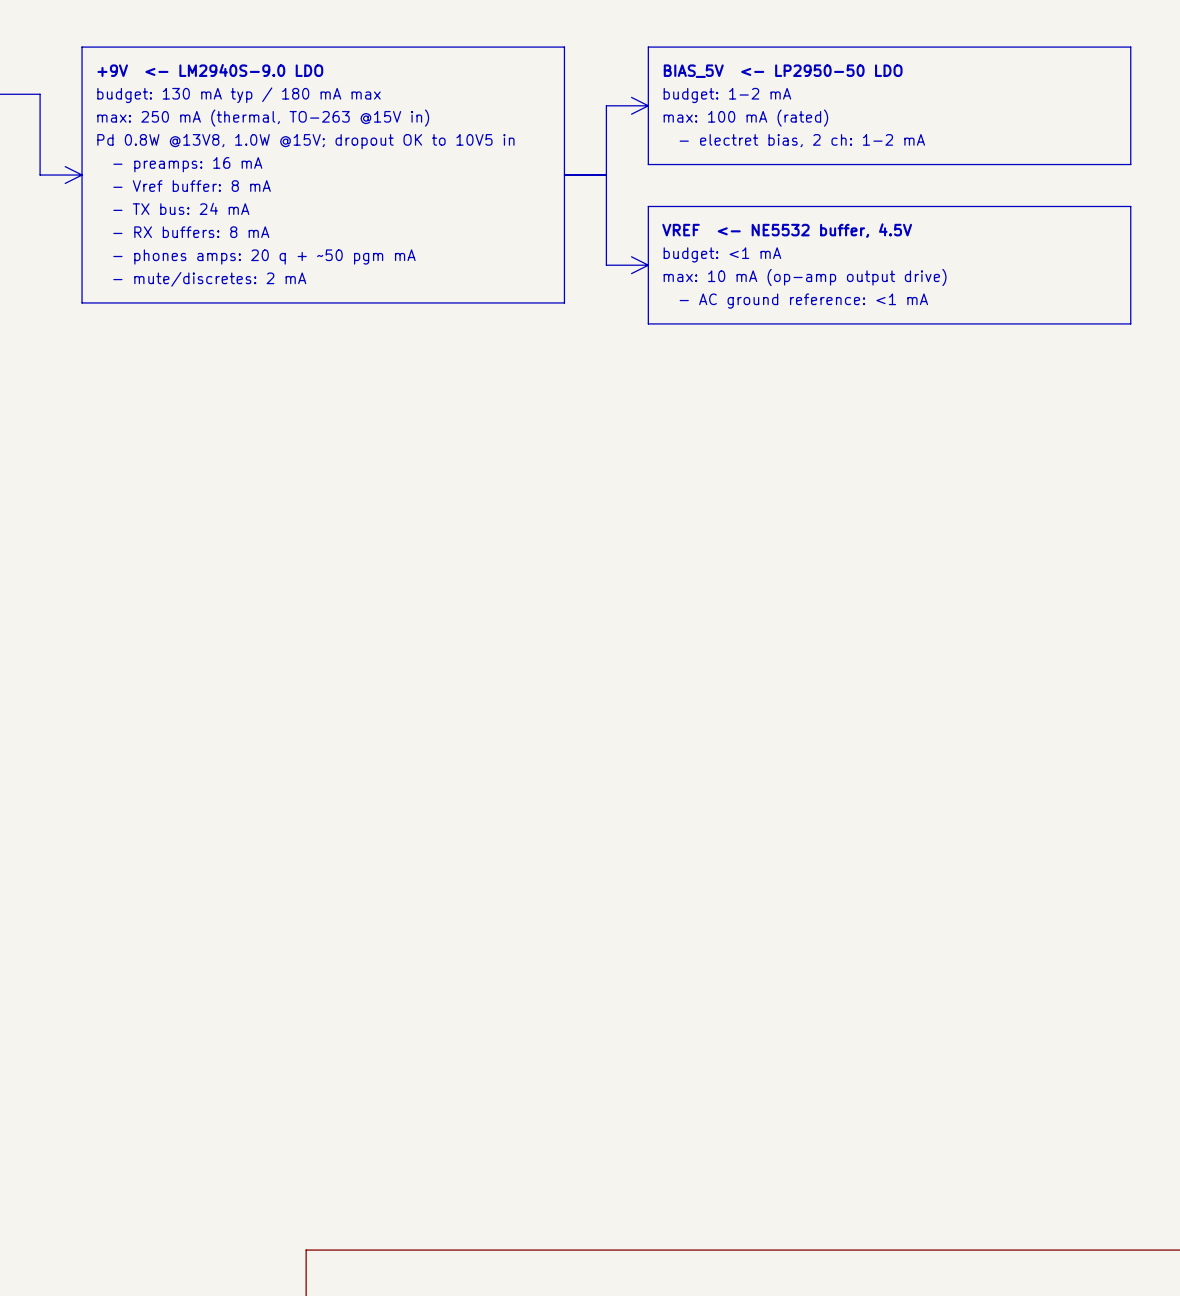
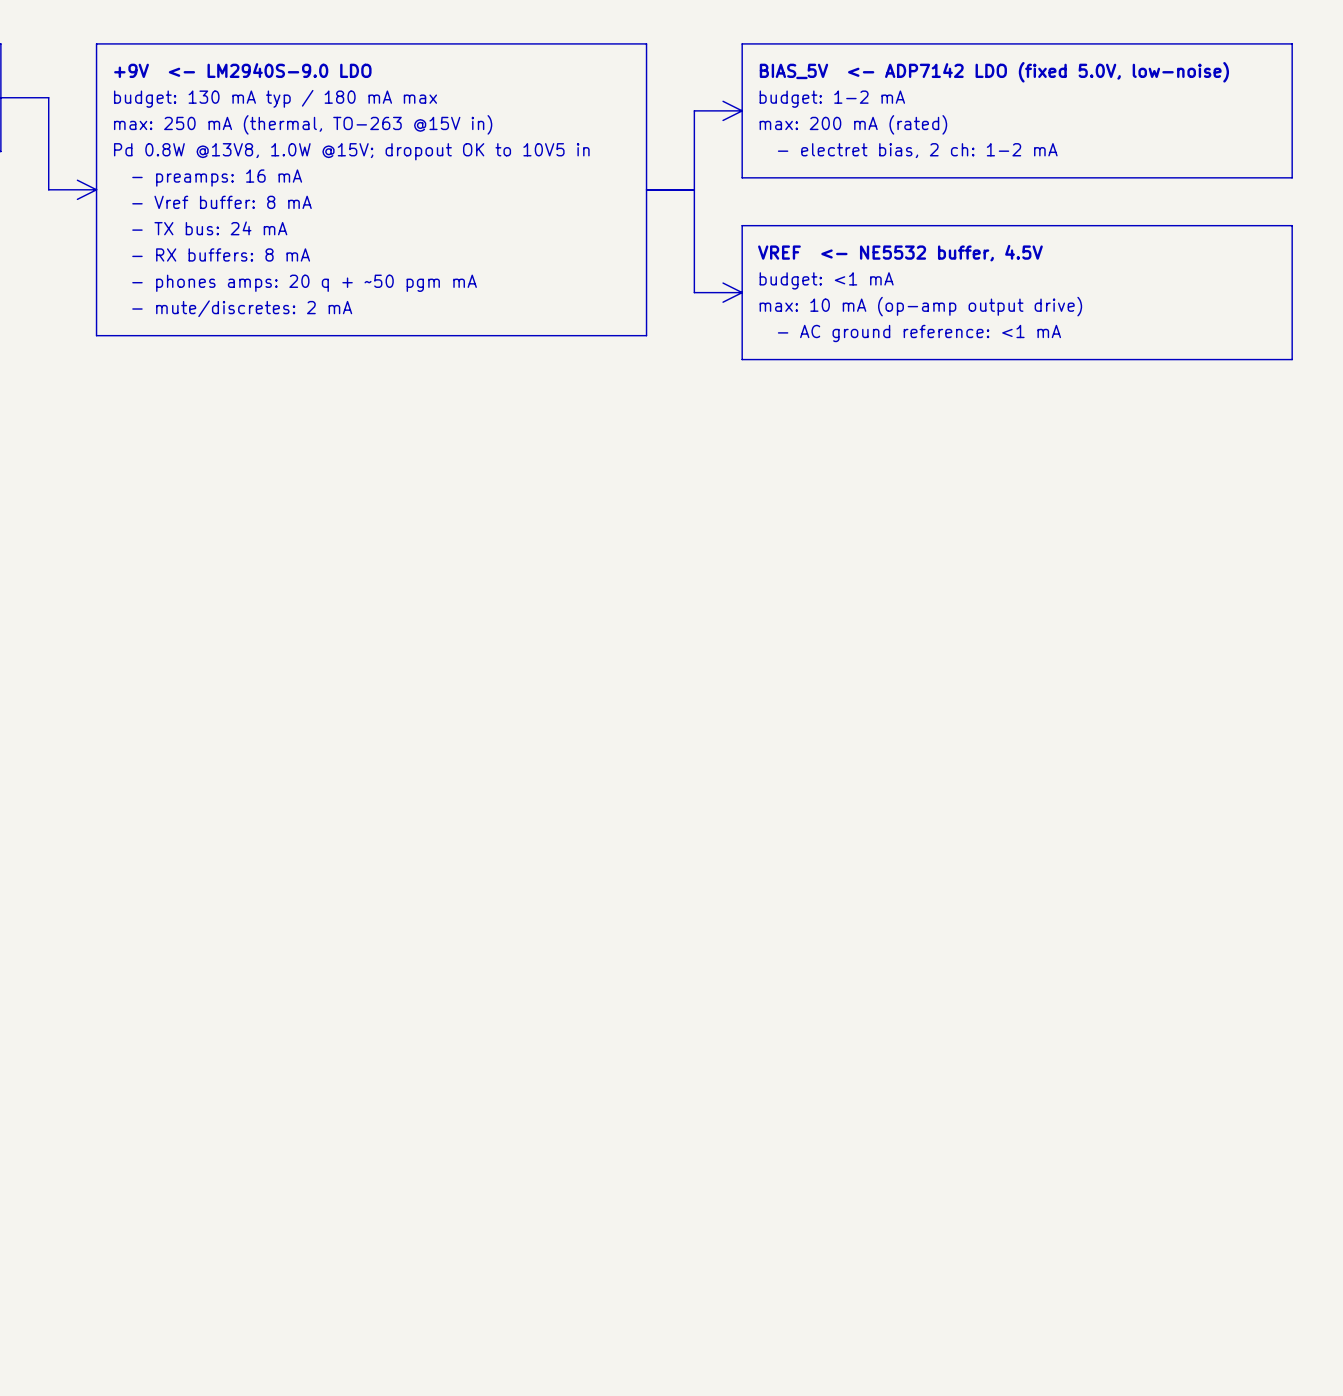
text: BIAS_5V <- LP2950-50 LDO (783, 71) -> BIAS_5V <- ADP7142 LDO (fixed 5.0V, low-noise) (994, 72)
text: max: 100 mA (rated) (745, 118) -> max: 200 mA (rated) (853, 124)

